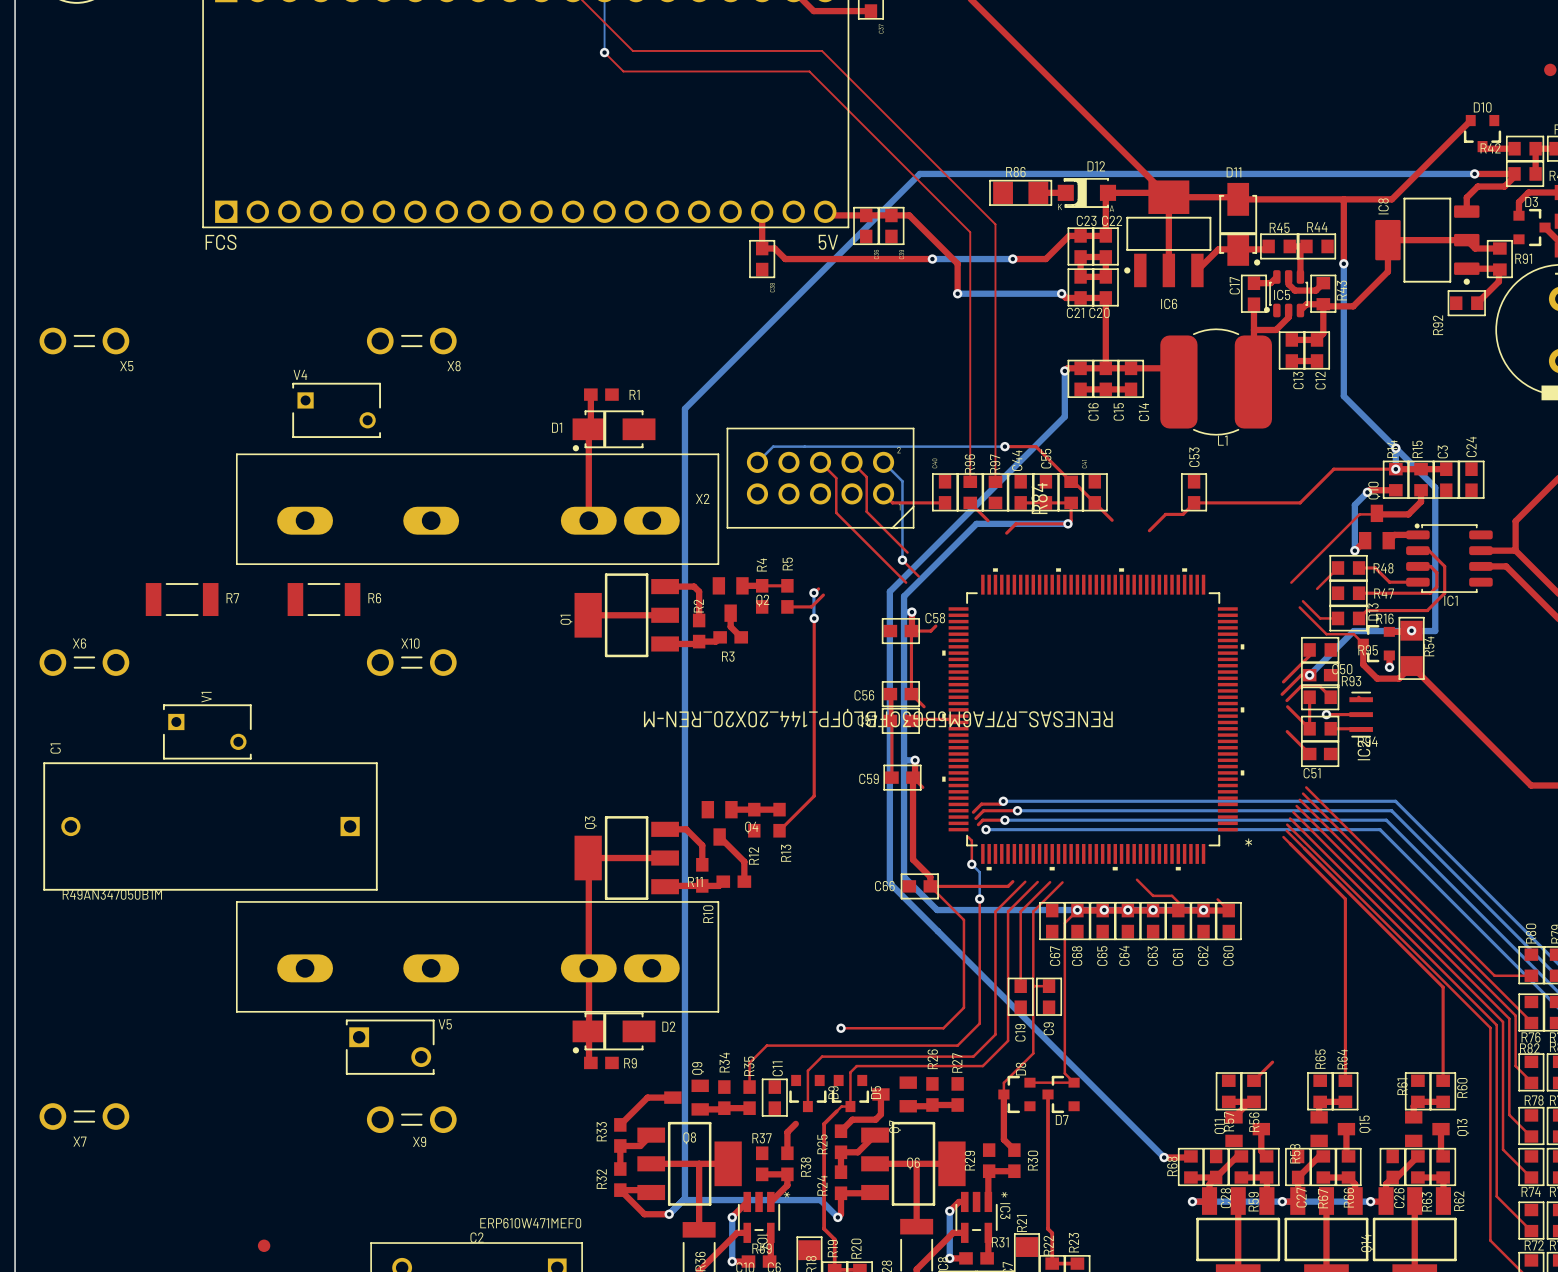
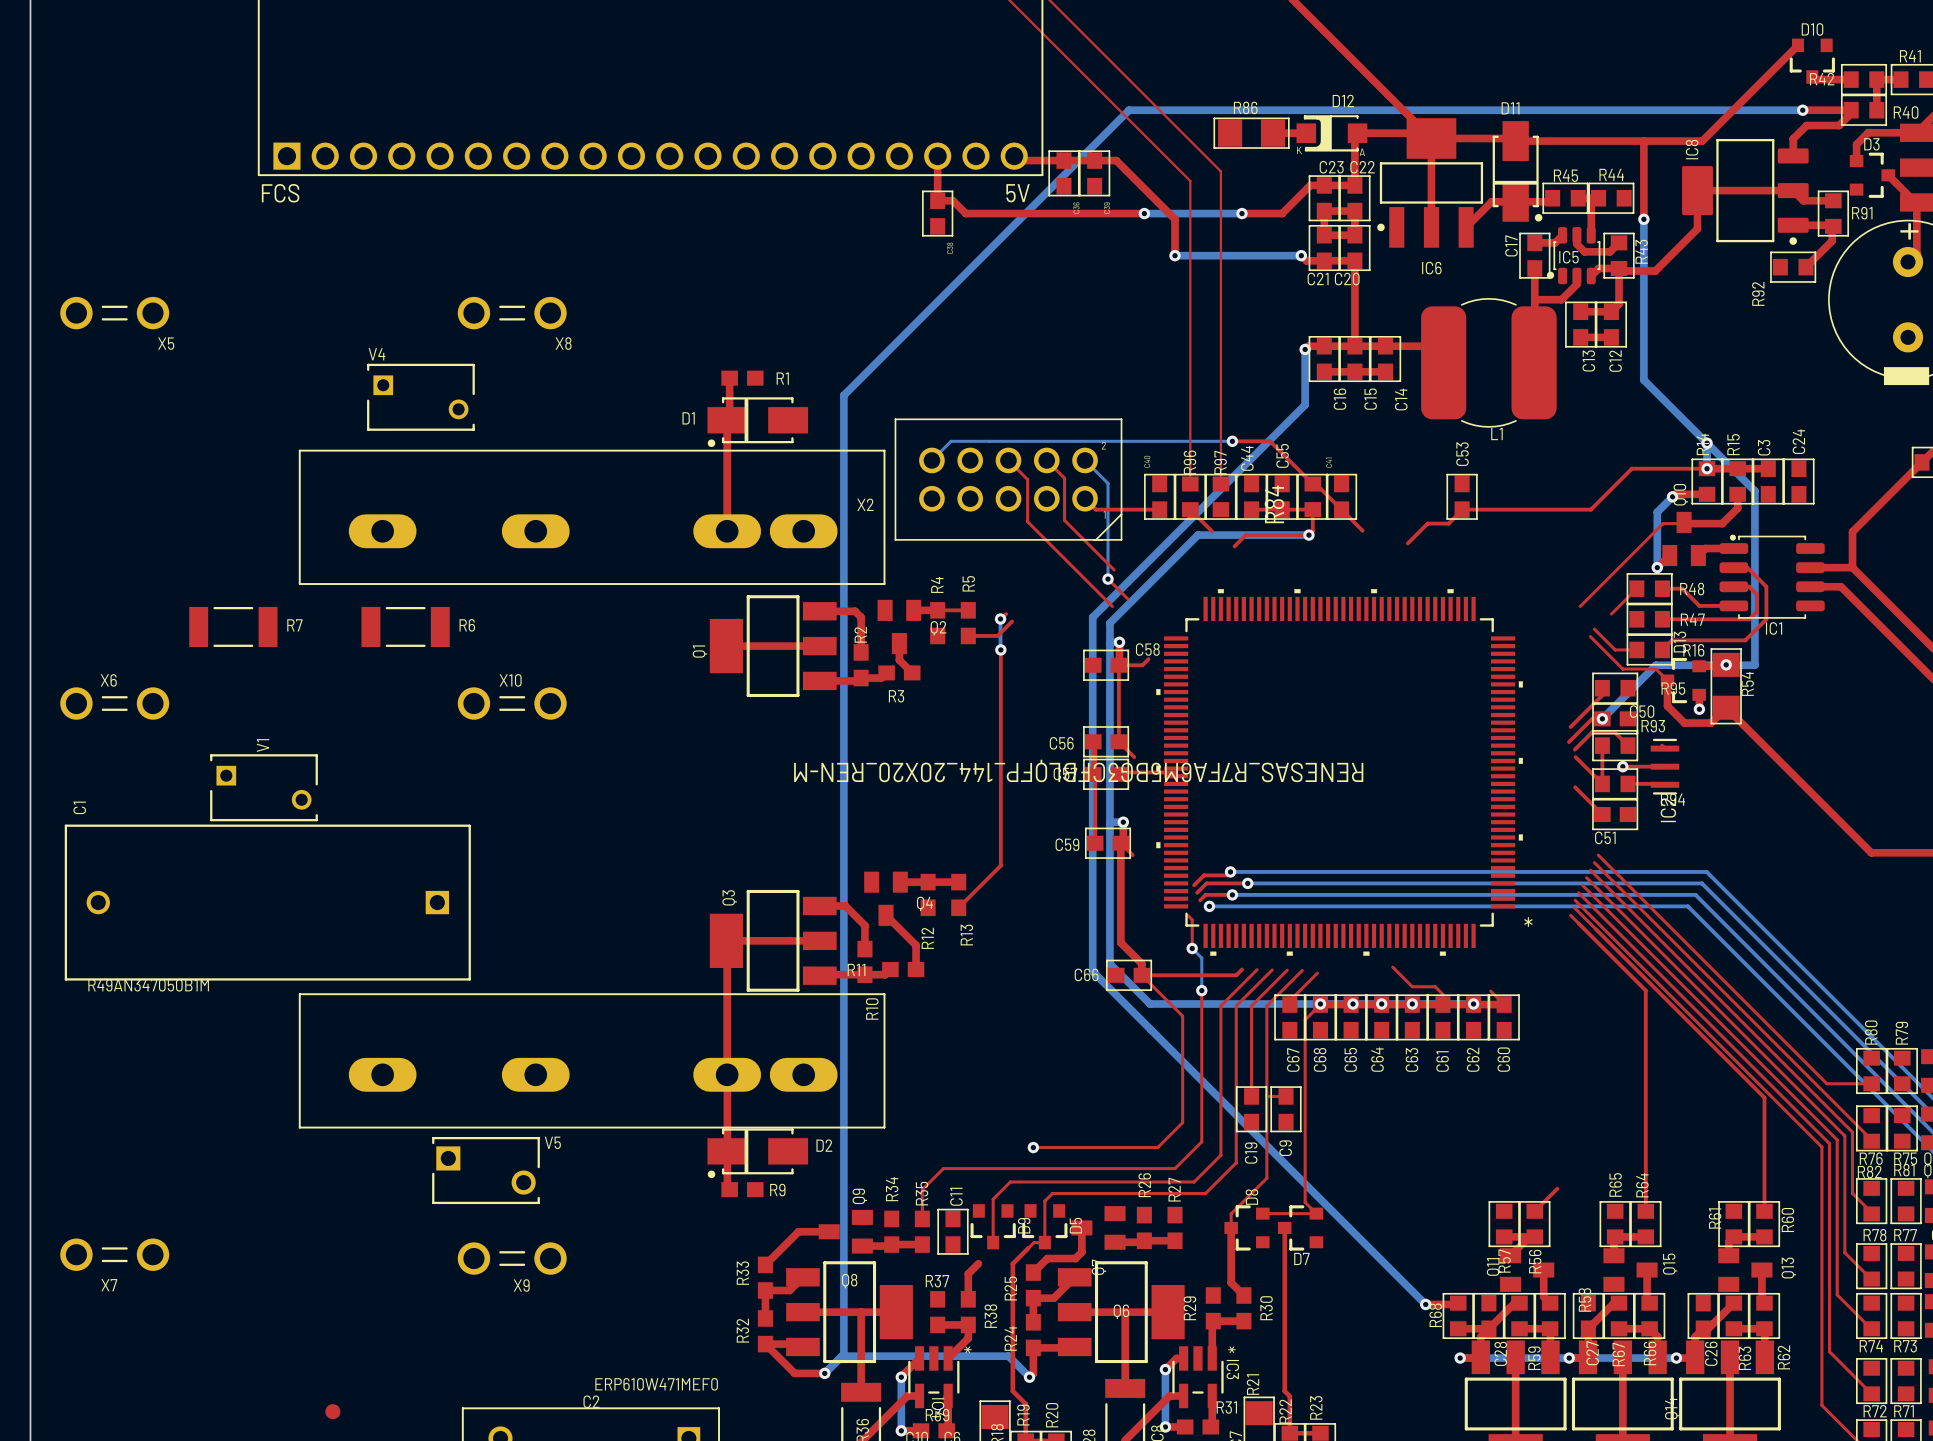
top track: none -> (1317, 973) (1289, 1000) (1289, 1004)

